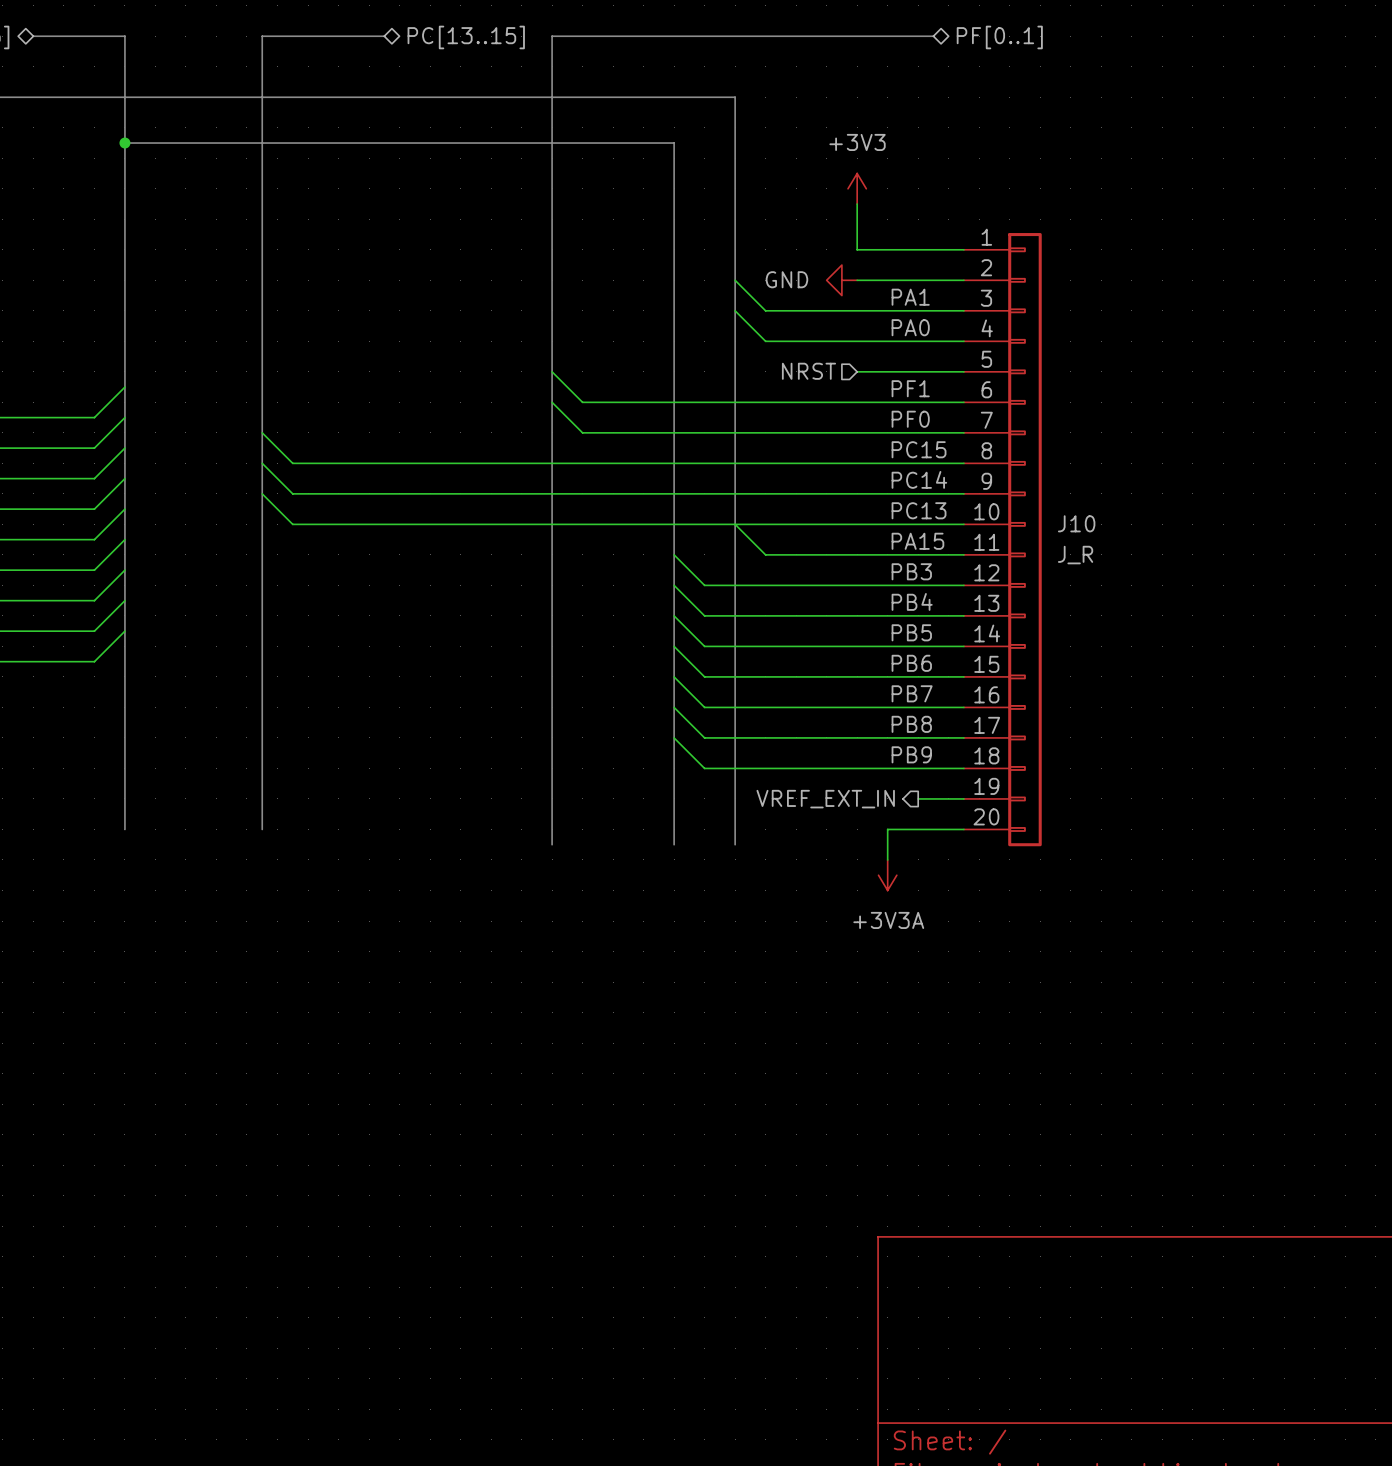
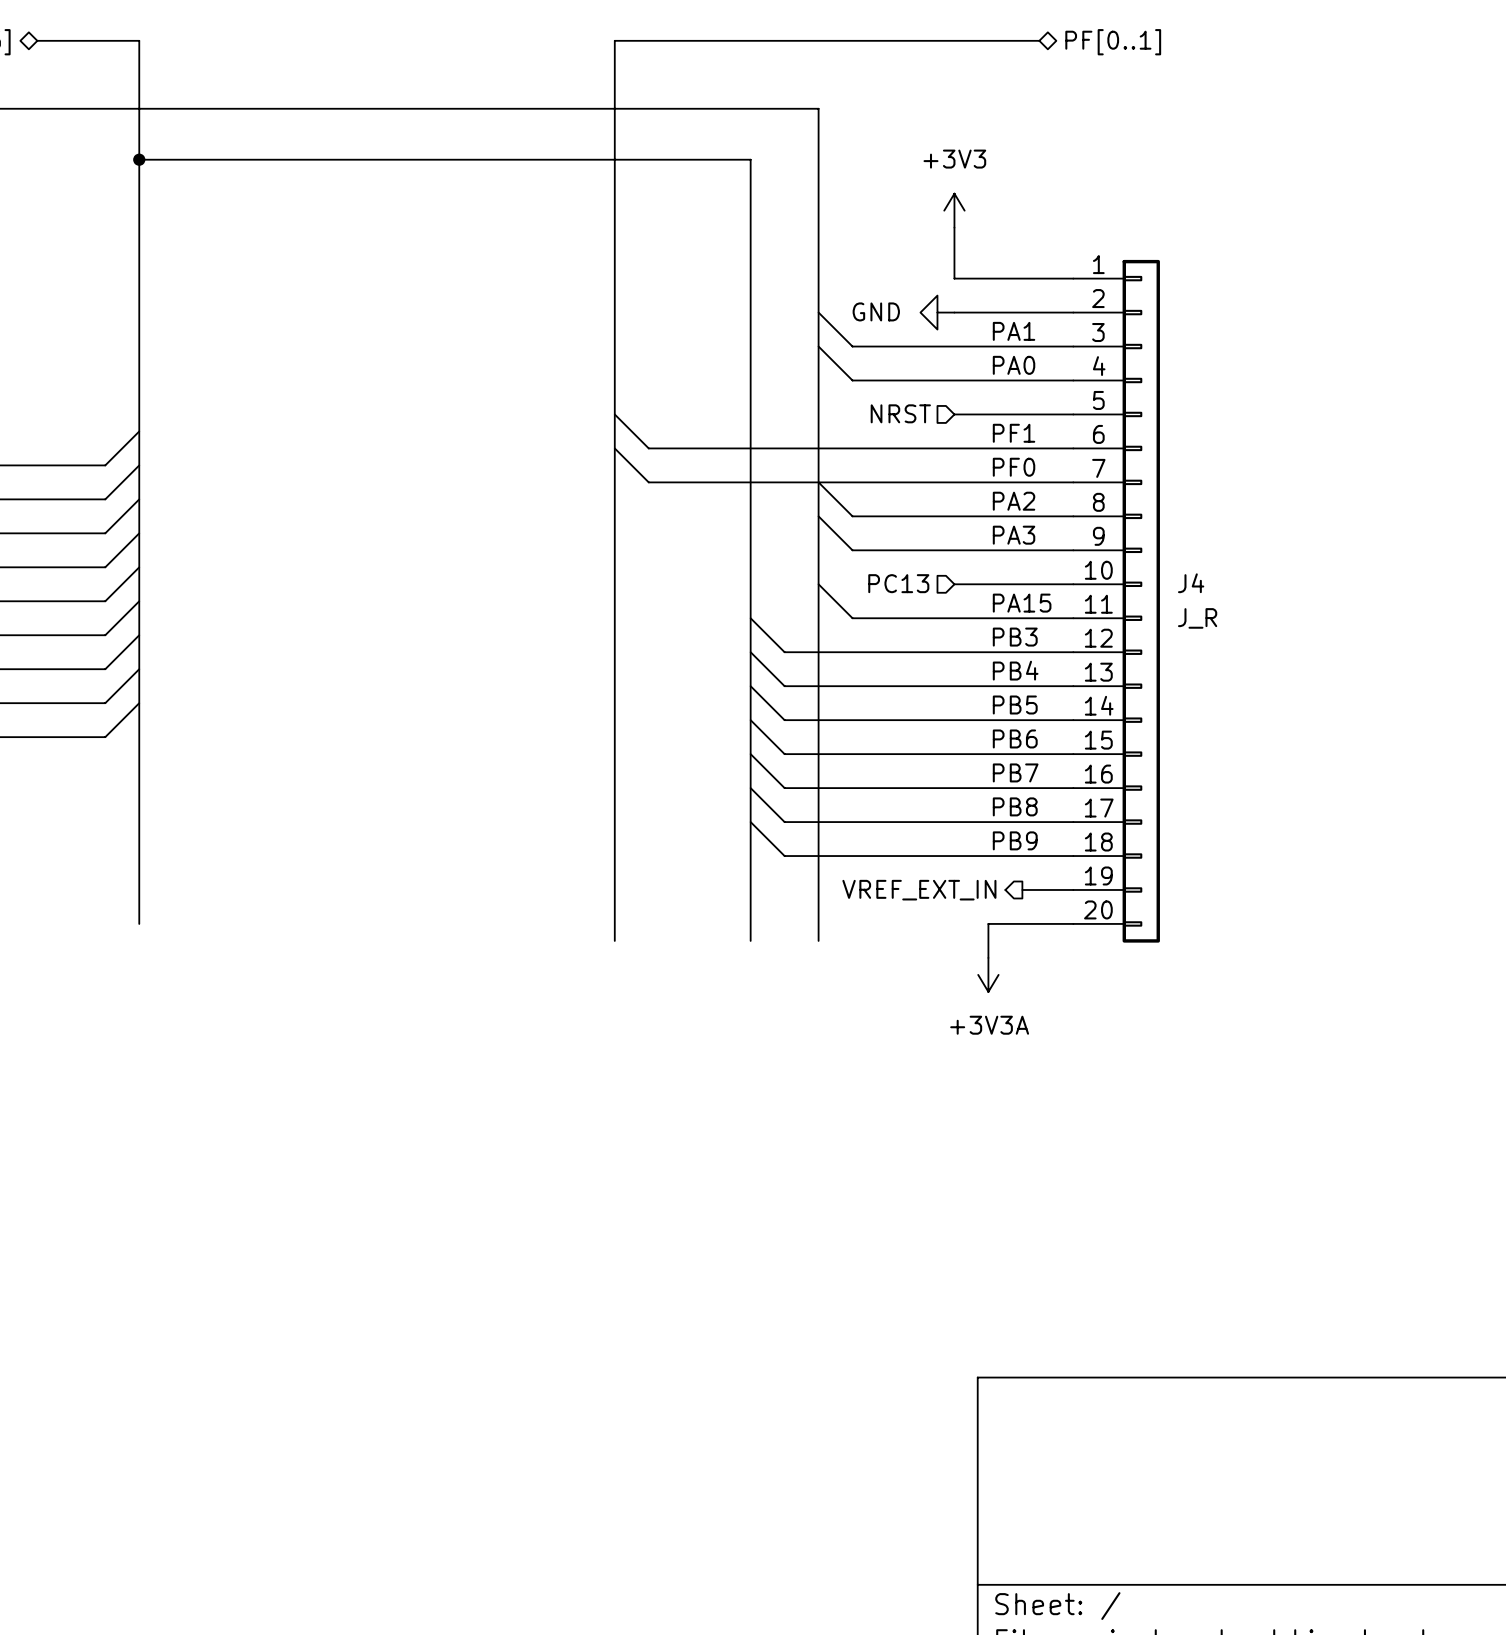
bus: (384, 36) (262, 36) (262, 829) -> none
hierarchical label: PC[13..15] (466, 37) -> none
wire: (262, 432) (292, 463) (765, 463) -> (818, 482) (852, 516)
label: PC15 (919, 449) -> PA2 (1014, 501)
wire: (262, 463) (292, 493) (765, 493) -> (818, 516) (852, 550)
label: PC14 (919, 479) -> PA3 (1014, 535)
wire: (262, 493) (292, 524) (857, 524) -> none
label: PC13 (919, 510) -> none
hierarchical label: none -> PC13 (898, 583)
J10 name: J10 (1076, 523) -> J4 (1191, 583)

